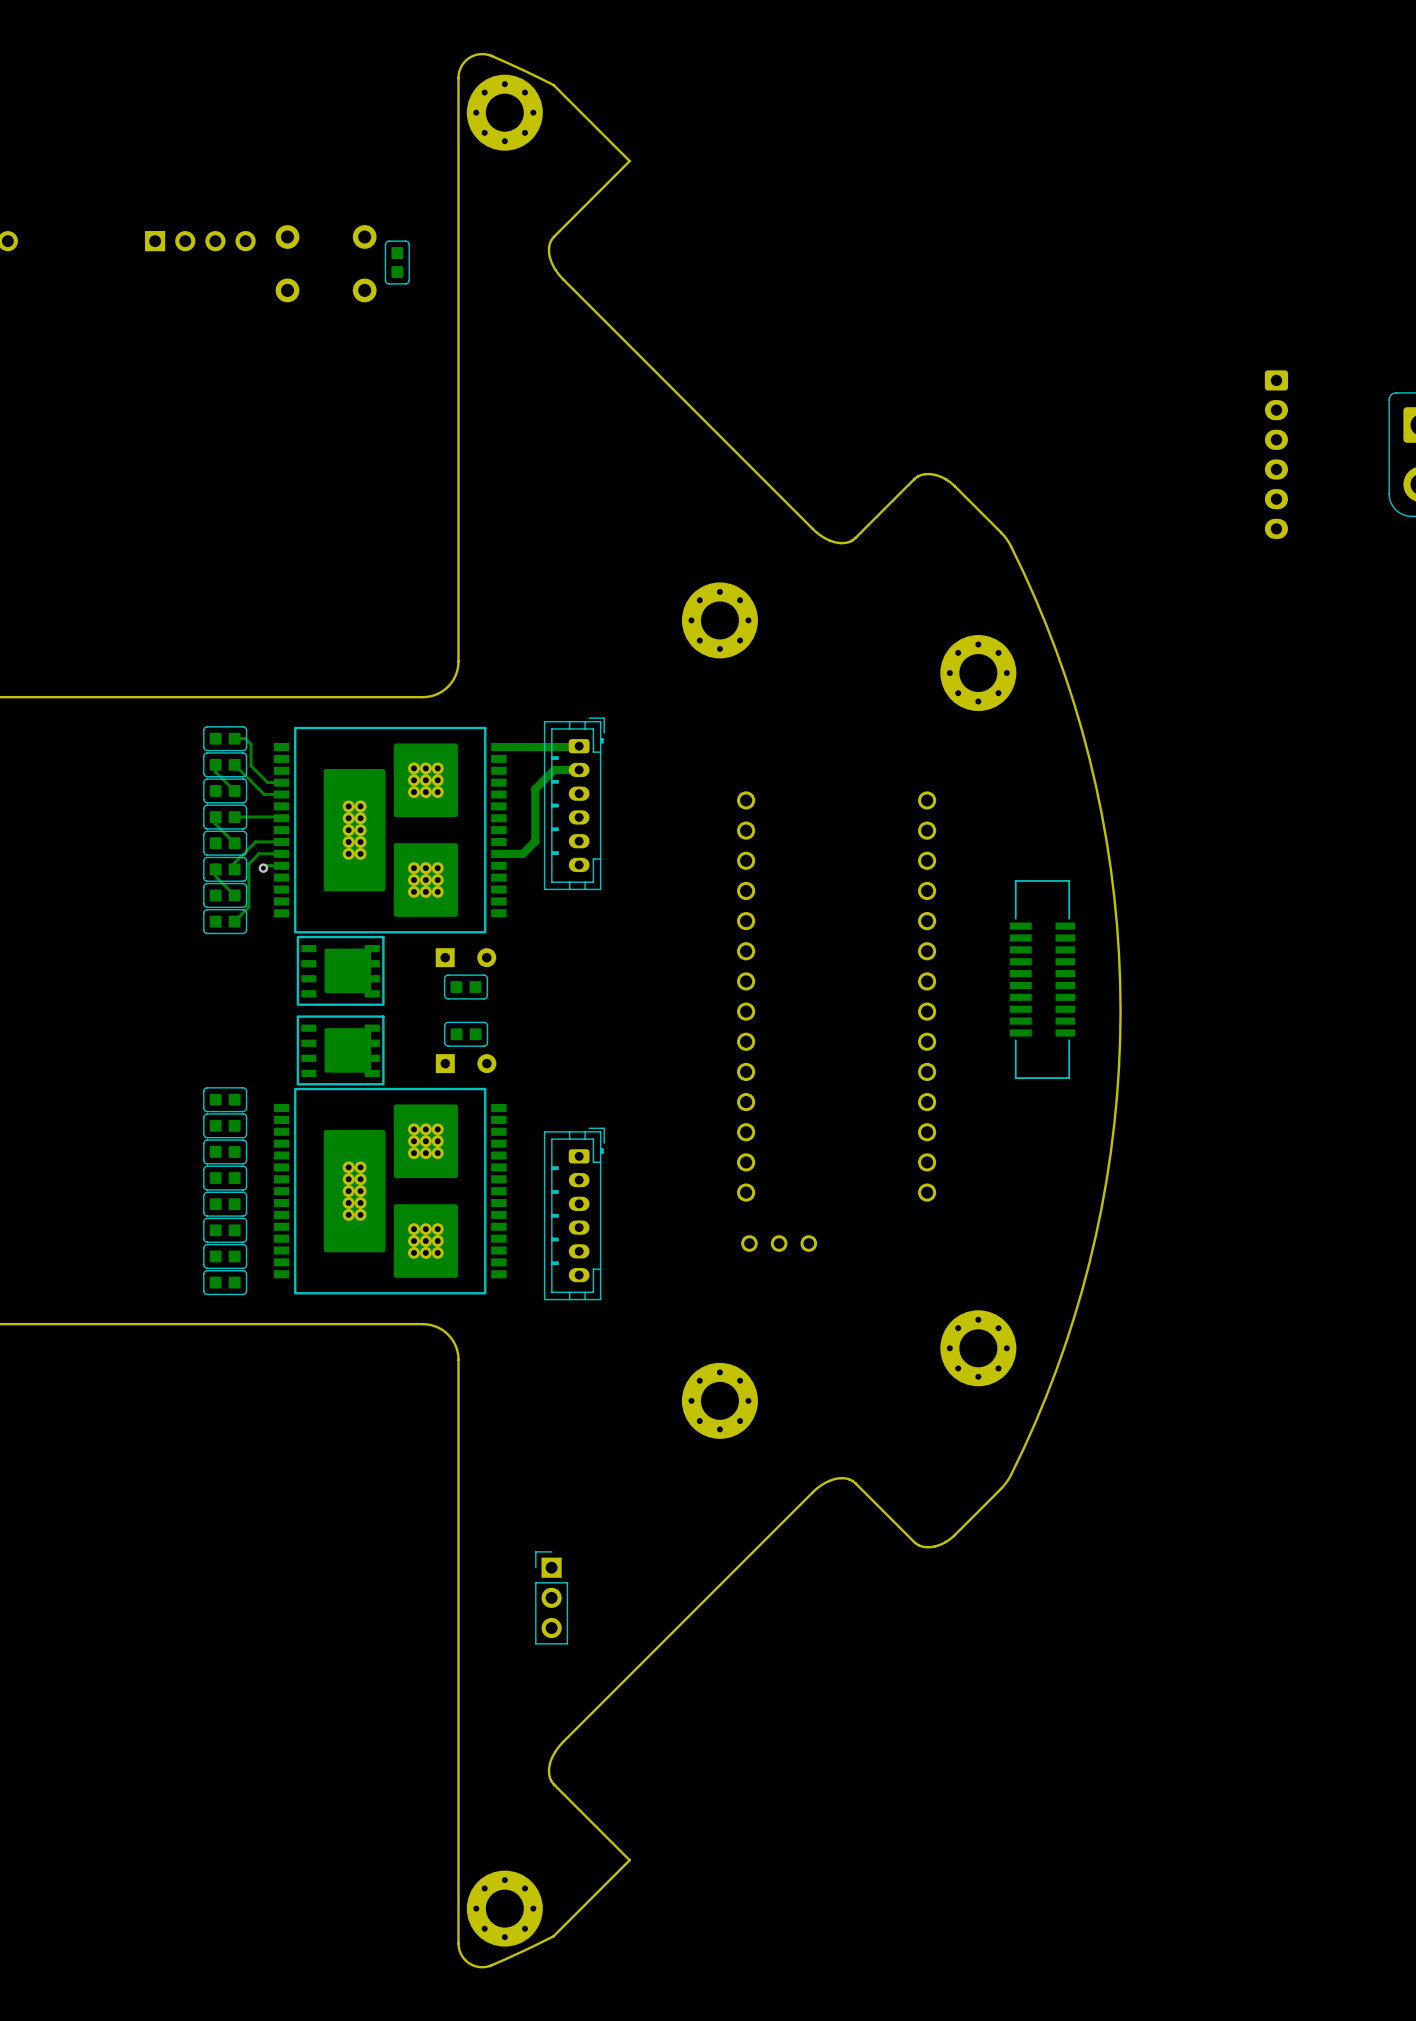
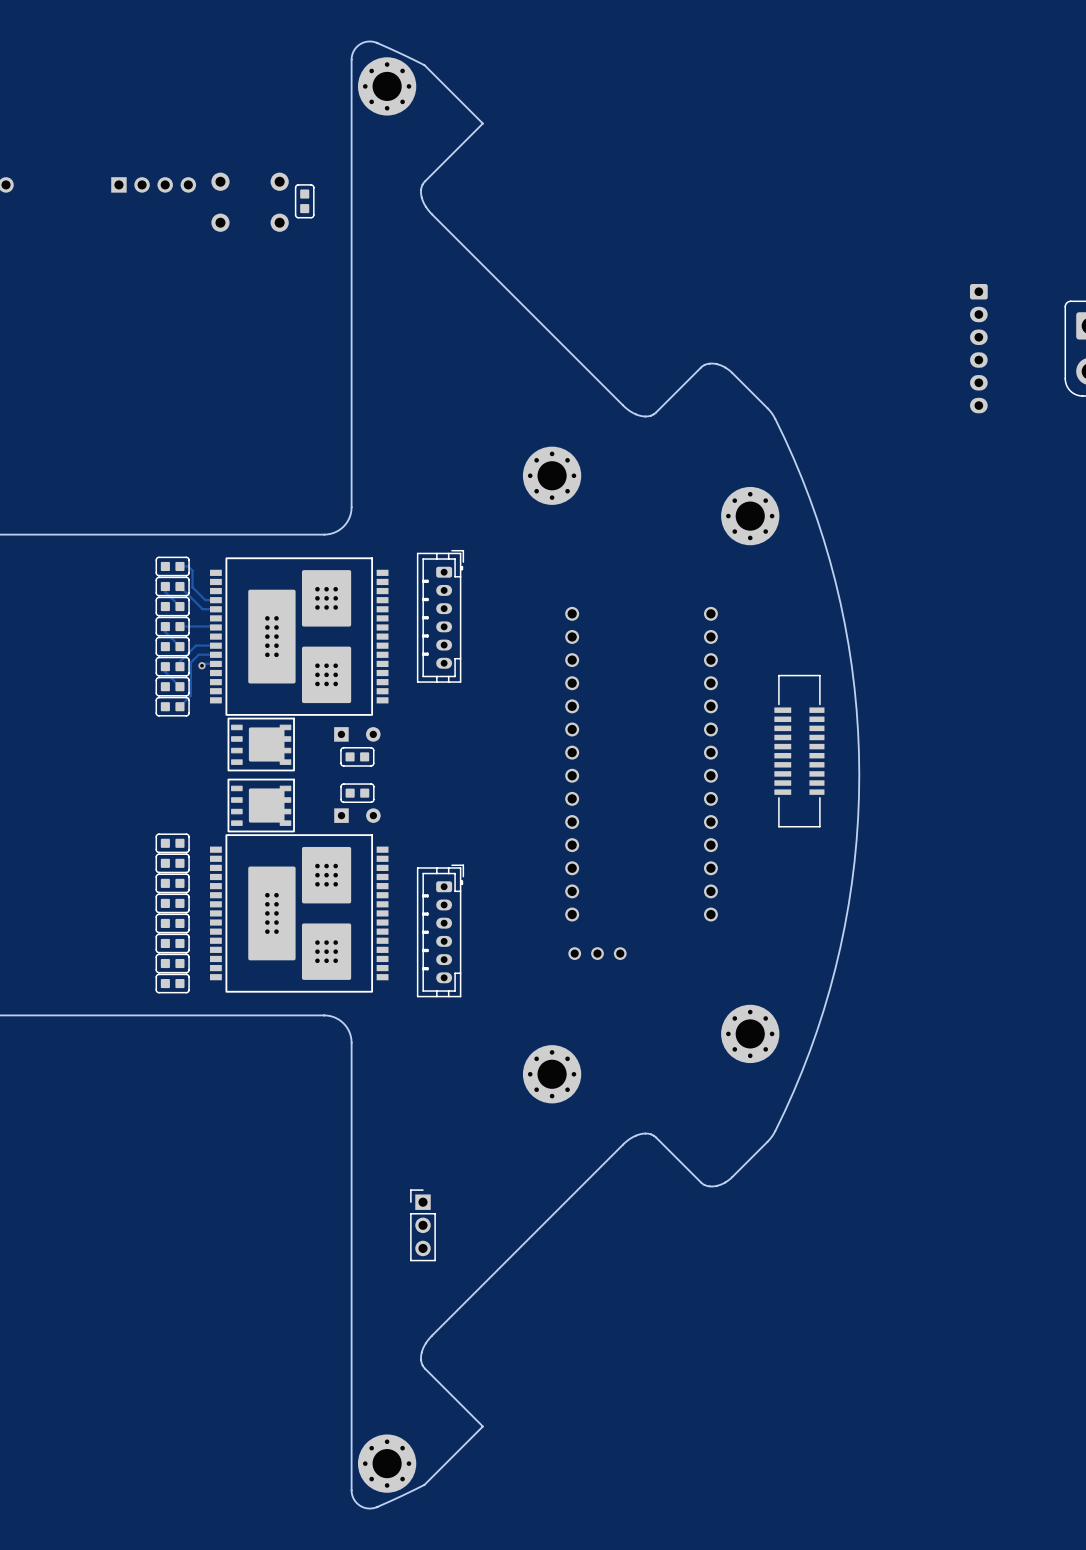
track: (578, 747) (498, 747) -> none
track: (579, 769) (554, 769) (535, 789) (535, 841) (522, 853) (498, 853) -> none

